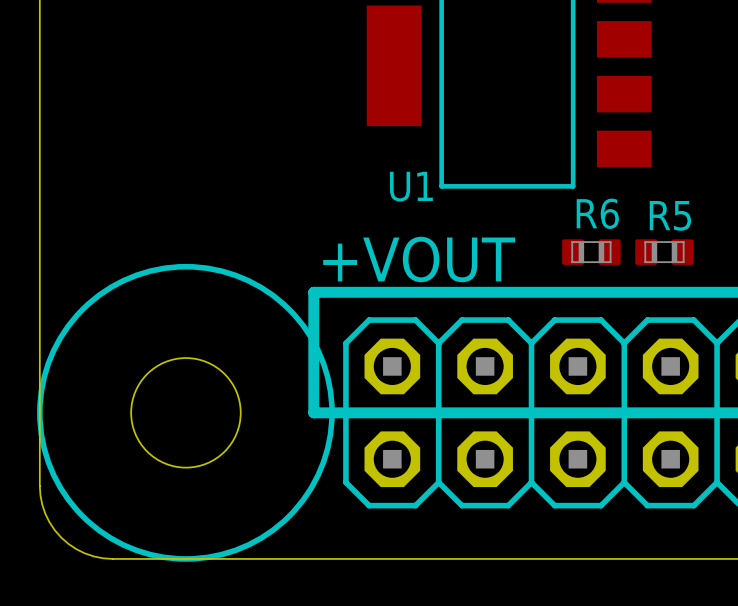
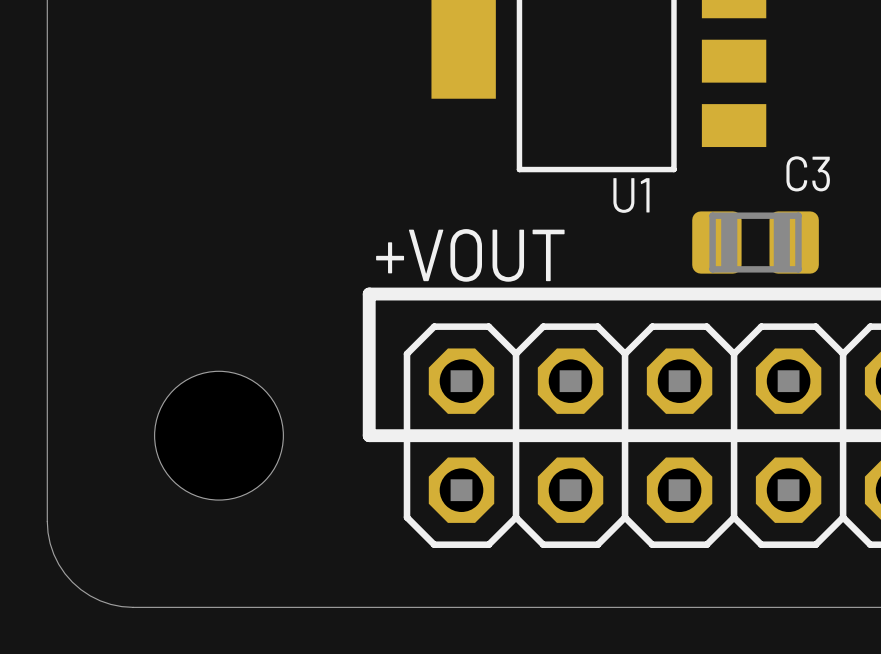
U1 name position: U1 (411, 186) -> U1 (631, 195)
C3: none -> (755, 242)
R6: (591, 252) -> none
R5: (664, 252) -> none
drawing: [37, 263, 335, 562] -> none

